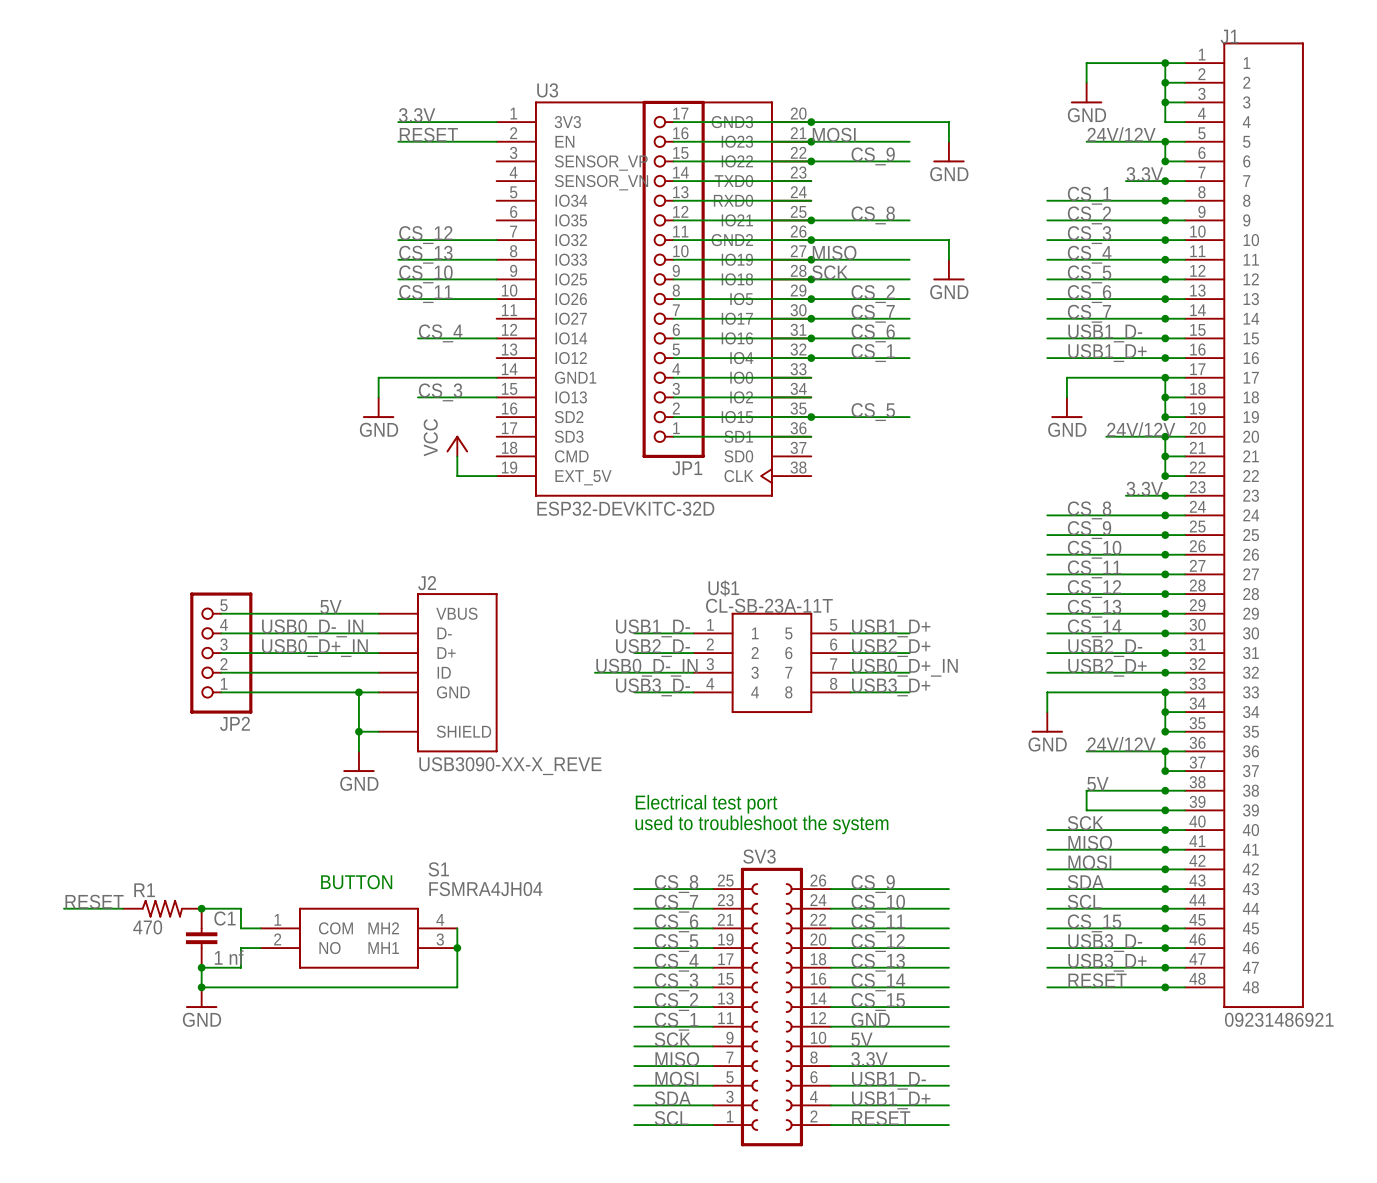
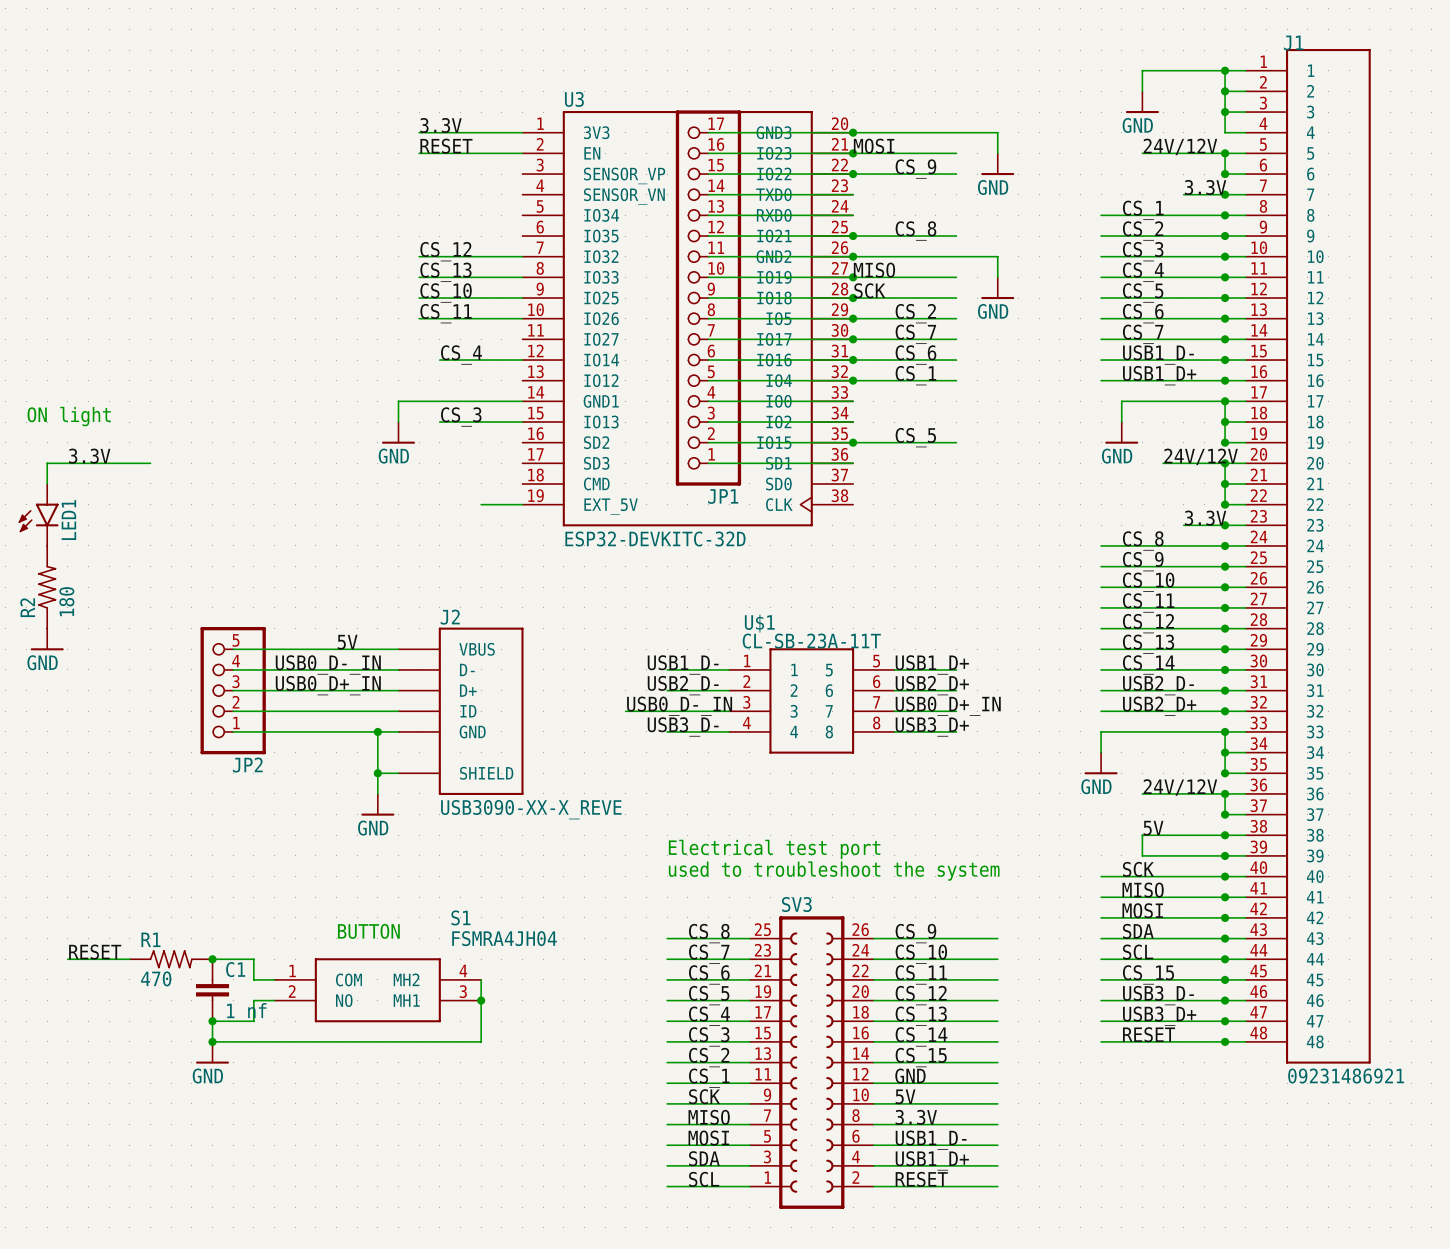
text: none -> ON light (69, 416)
label: none -> 3.3V (89, 456)
wire: none -> (150, 463) (47, 463) (47, 483)
power symbol: VCC (457, 446) -> none
wire: (457, 456) (457, 476) -> none
LED1: none -> (38, 514)
R2: none -> 180 (47, 587)
power symbol: none -> GND (47, 639)

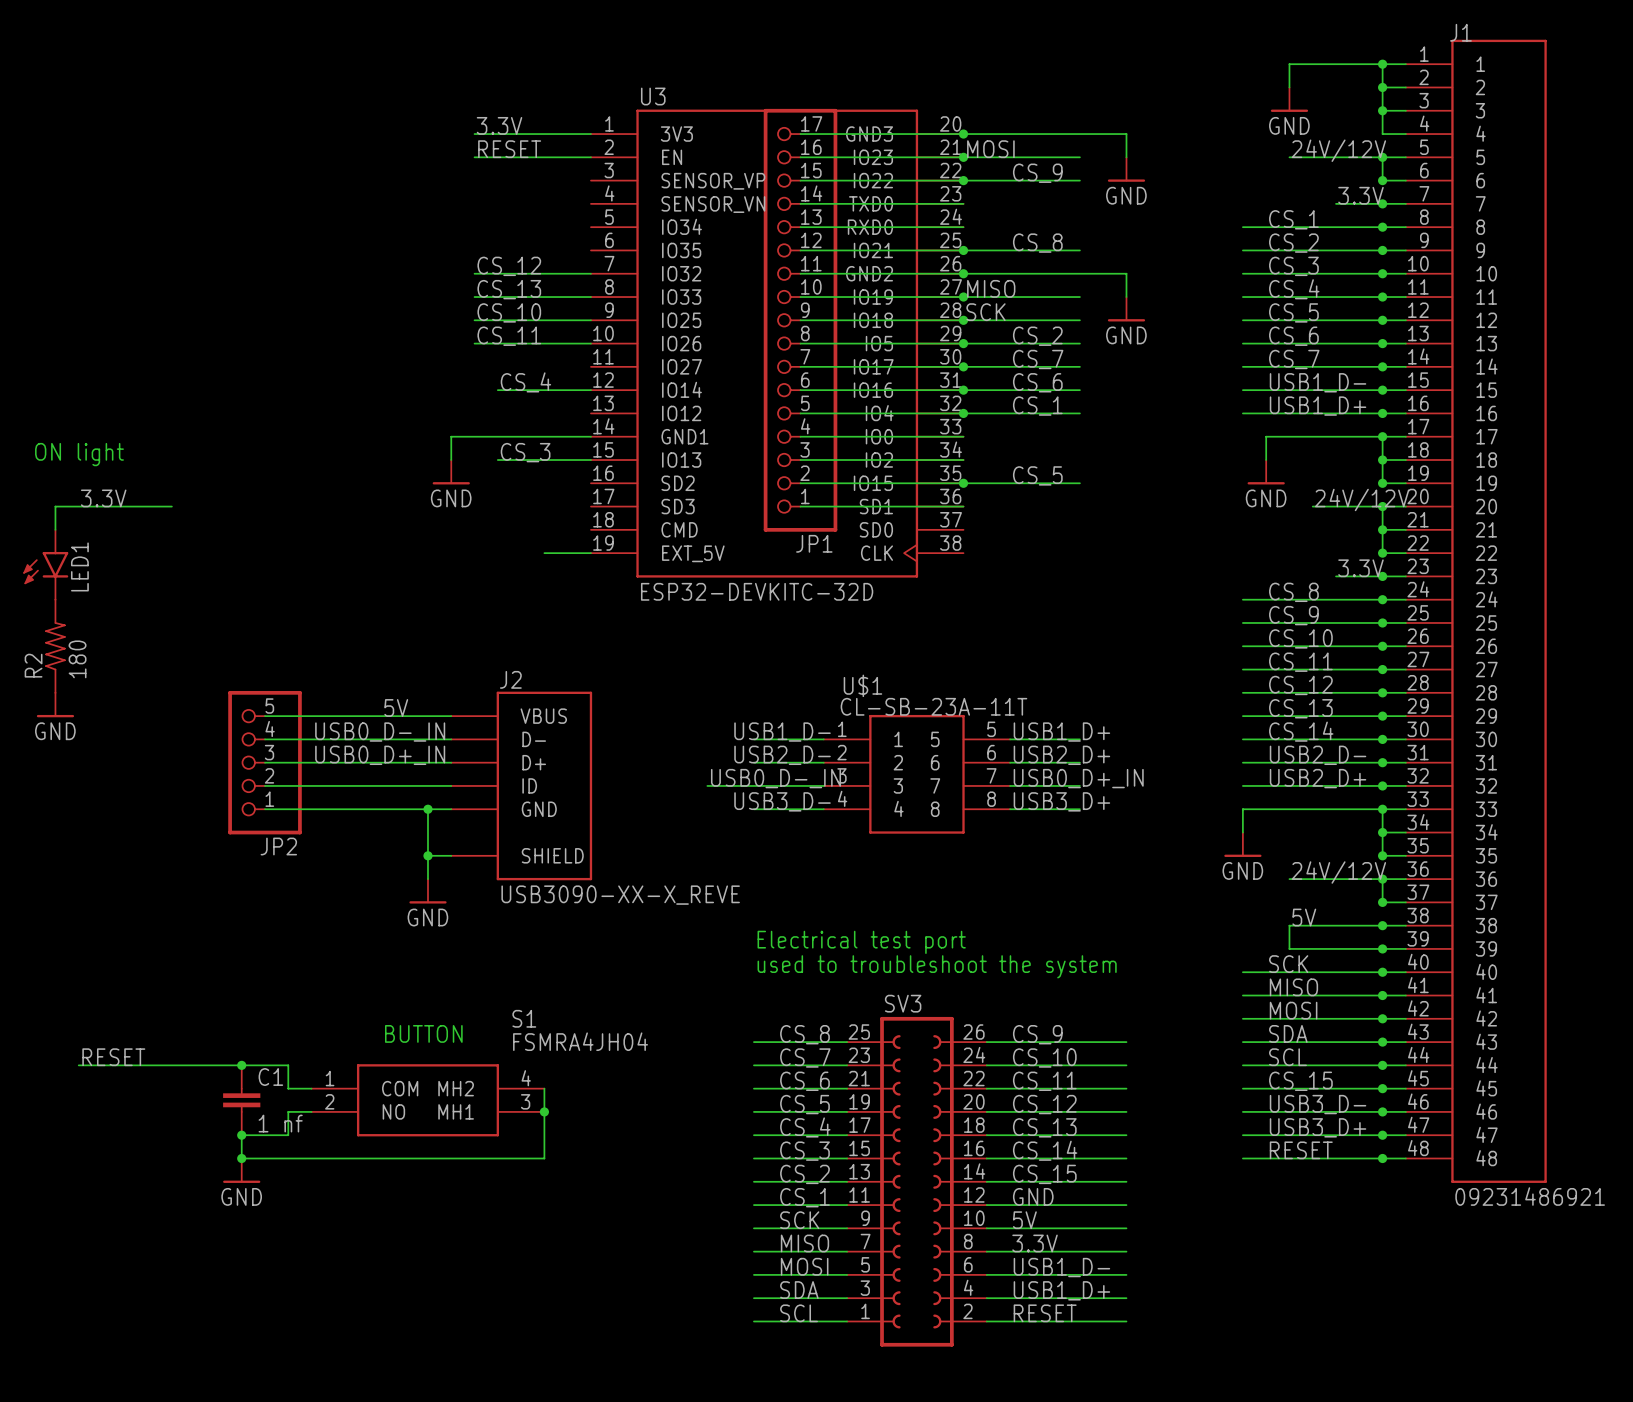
R1: 470 (171, 959) -> none

